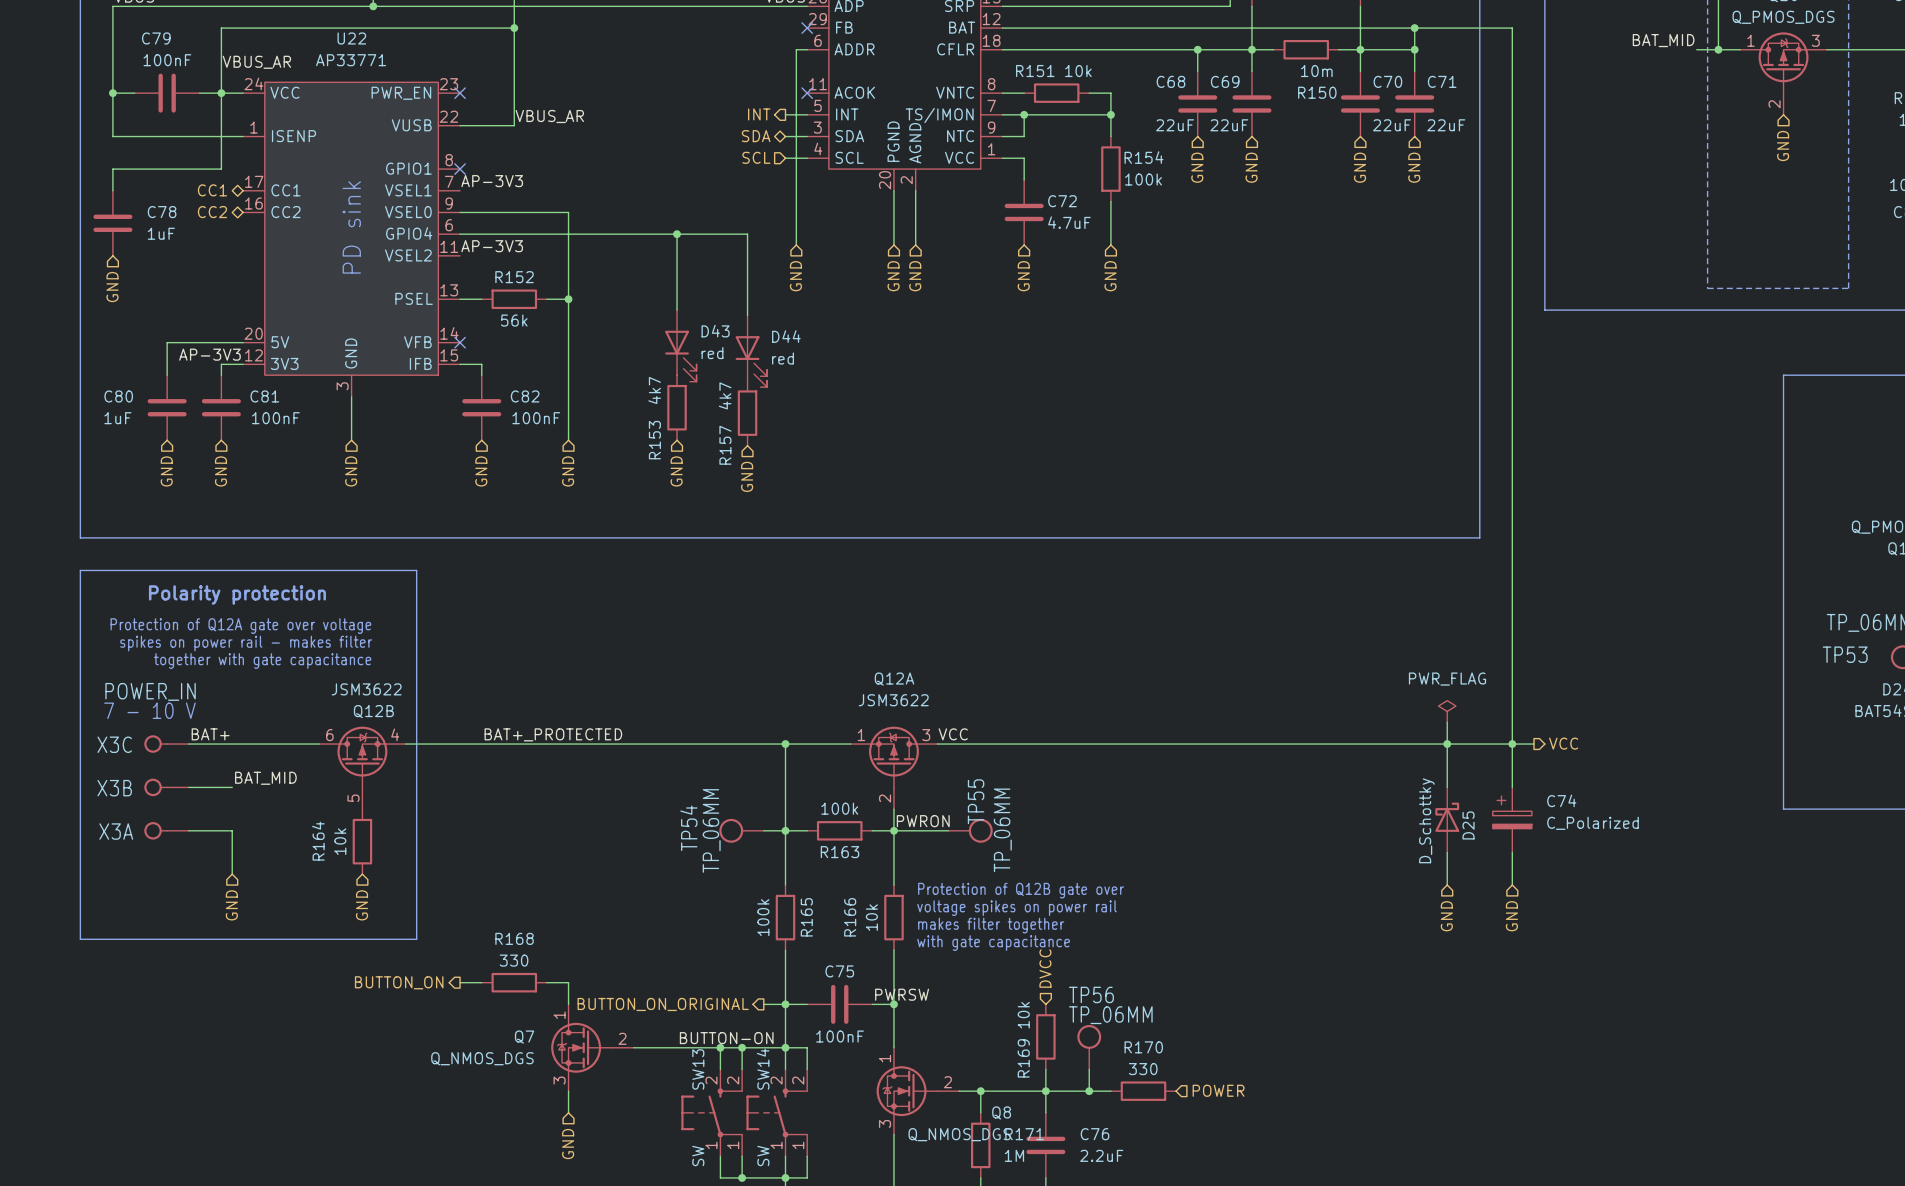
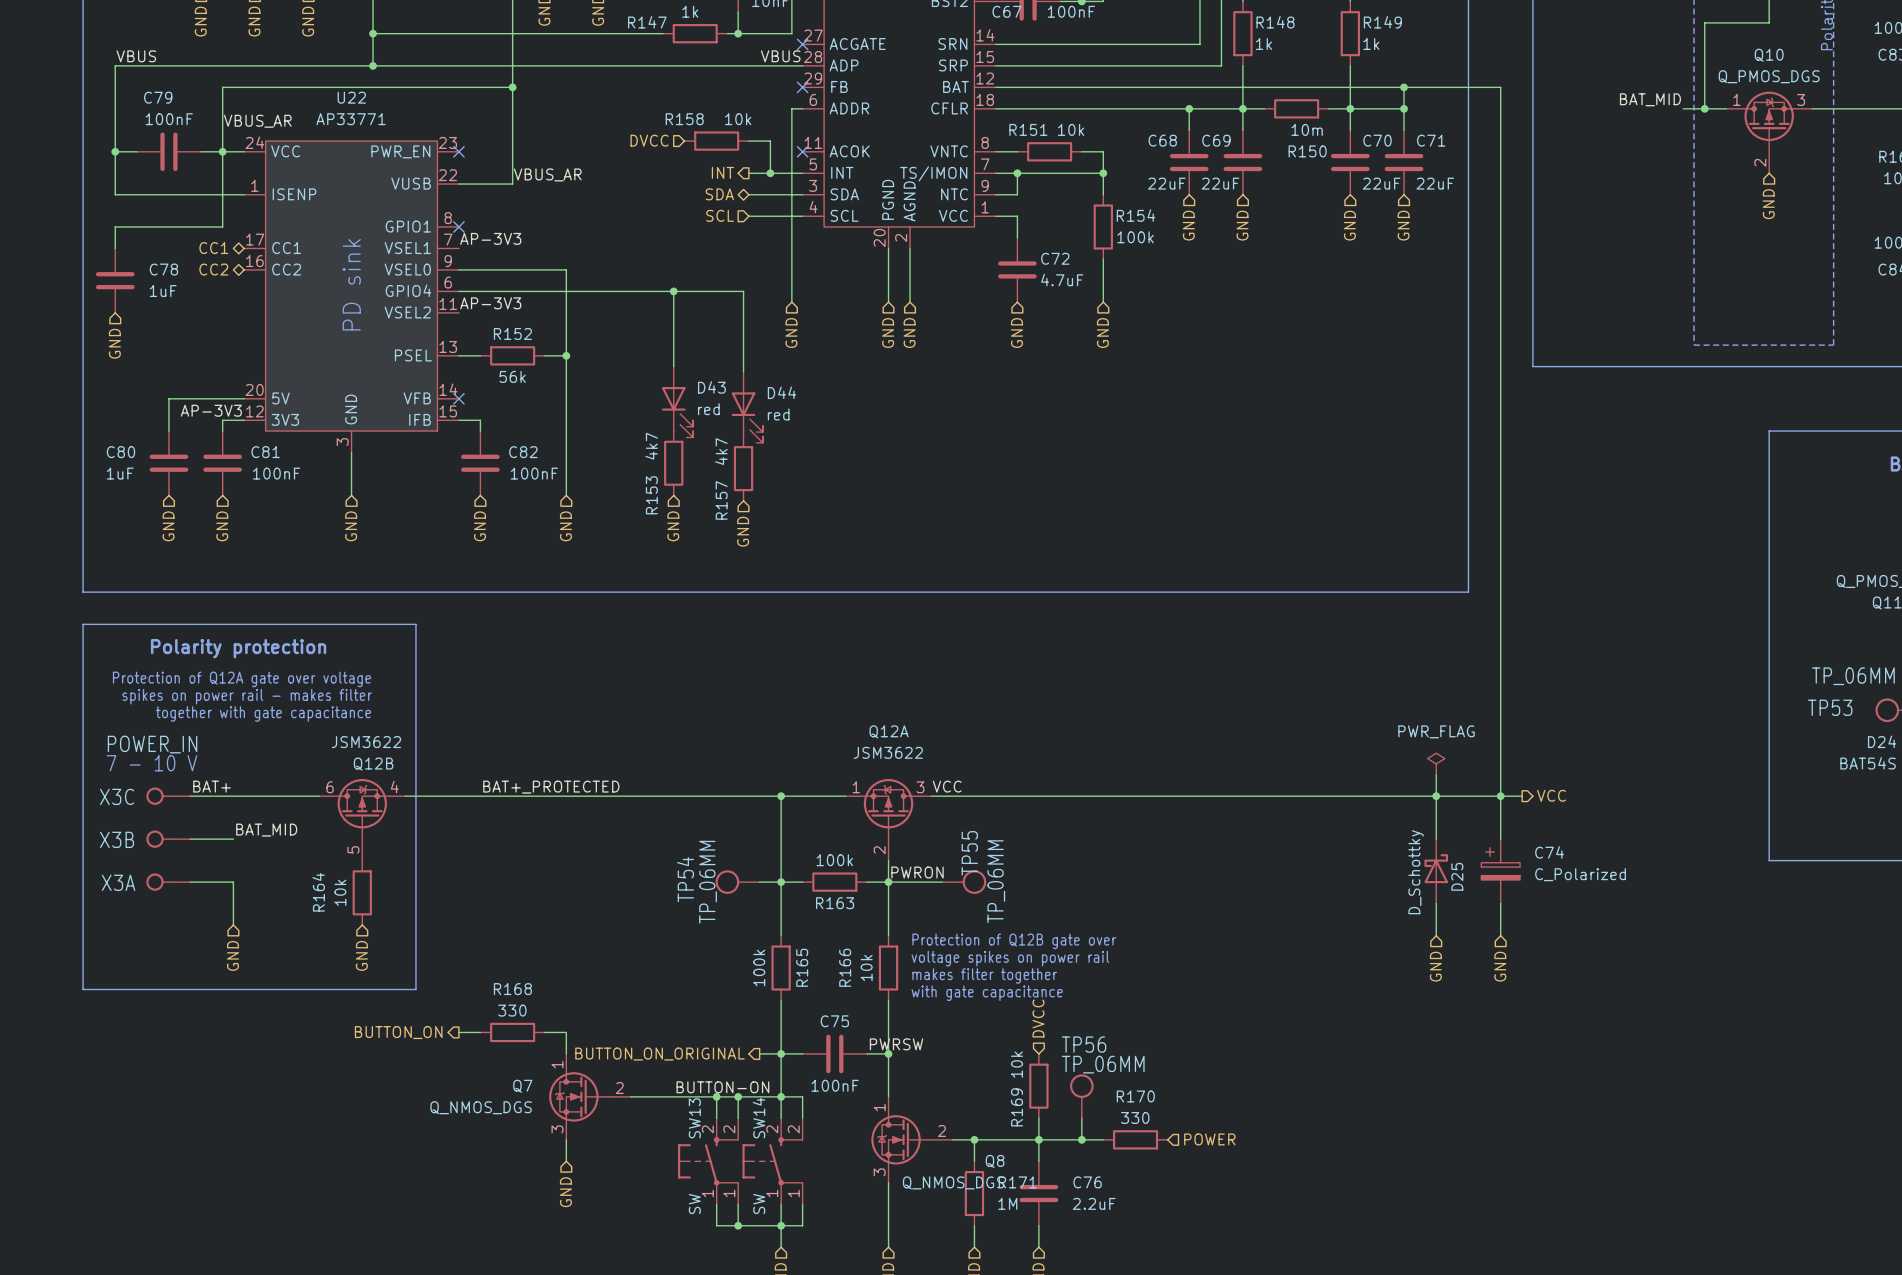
hierarchical label: none -> DVCC (649, 140)
R158: none -> 10k (716, 141)
wire: none -> (748, 141) (770, 141) (770, 173)
wire: none -> (748, 173) (781, 173)
hierarchical label position: INT (759, 114) -> INT (722, 172)
junction: none -> (770, 173)
wire: none -> (748, 194) (781, 194)
hierarchical label position: SDA (756, 136) -> SDA (719, 194)
hierarchical label position: SCL (756, 157) -> SCL (720, 215)
wire: none -> (748, 216) (781, 216)

